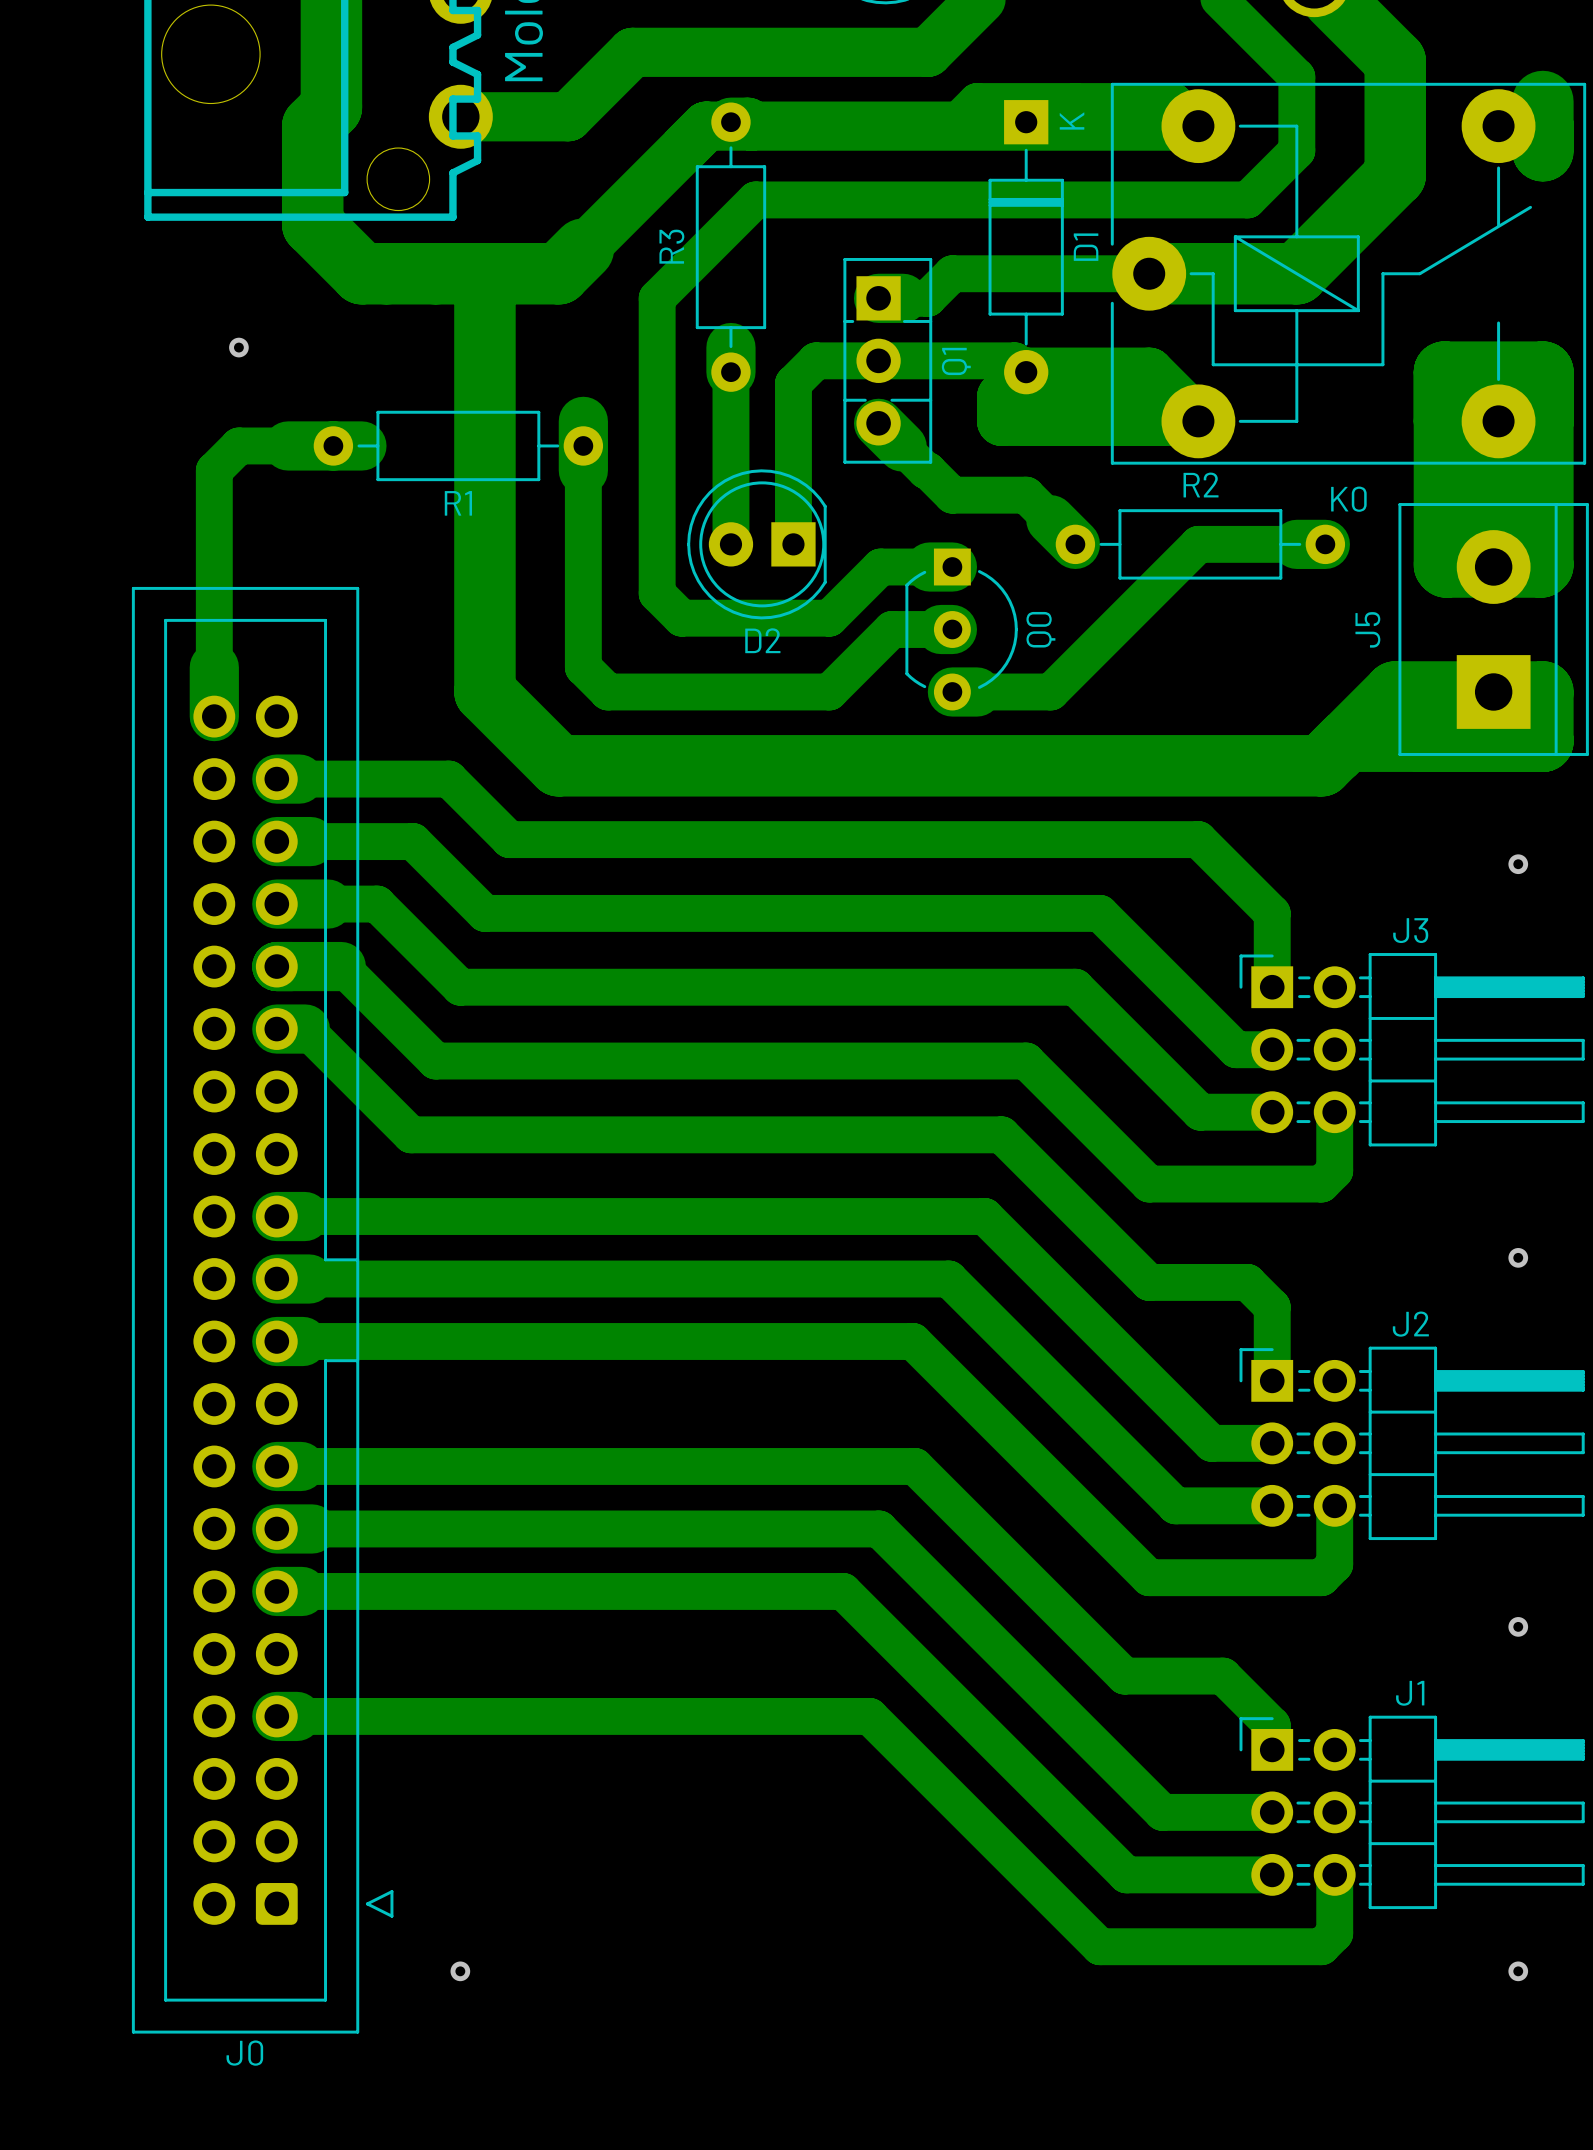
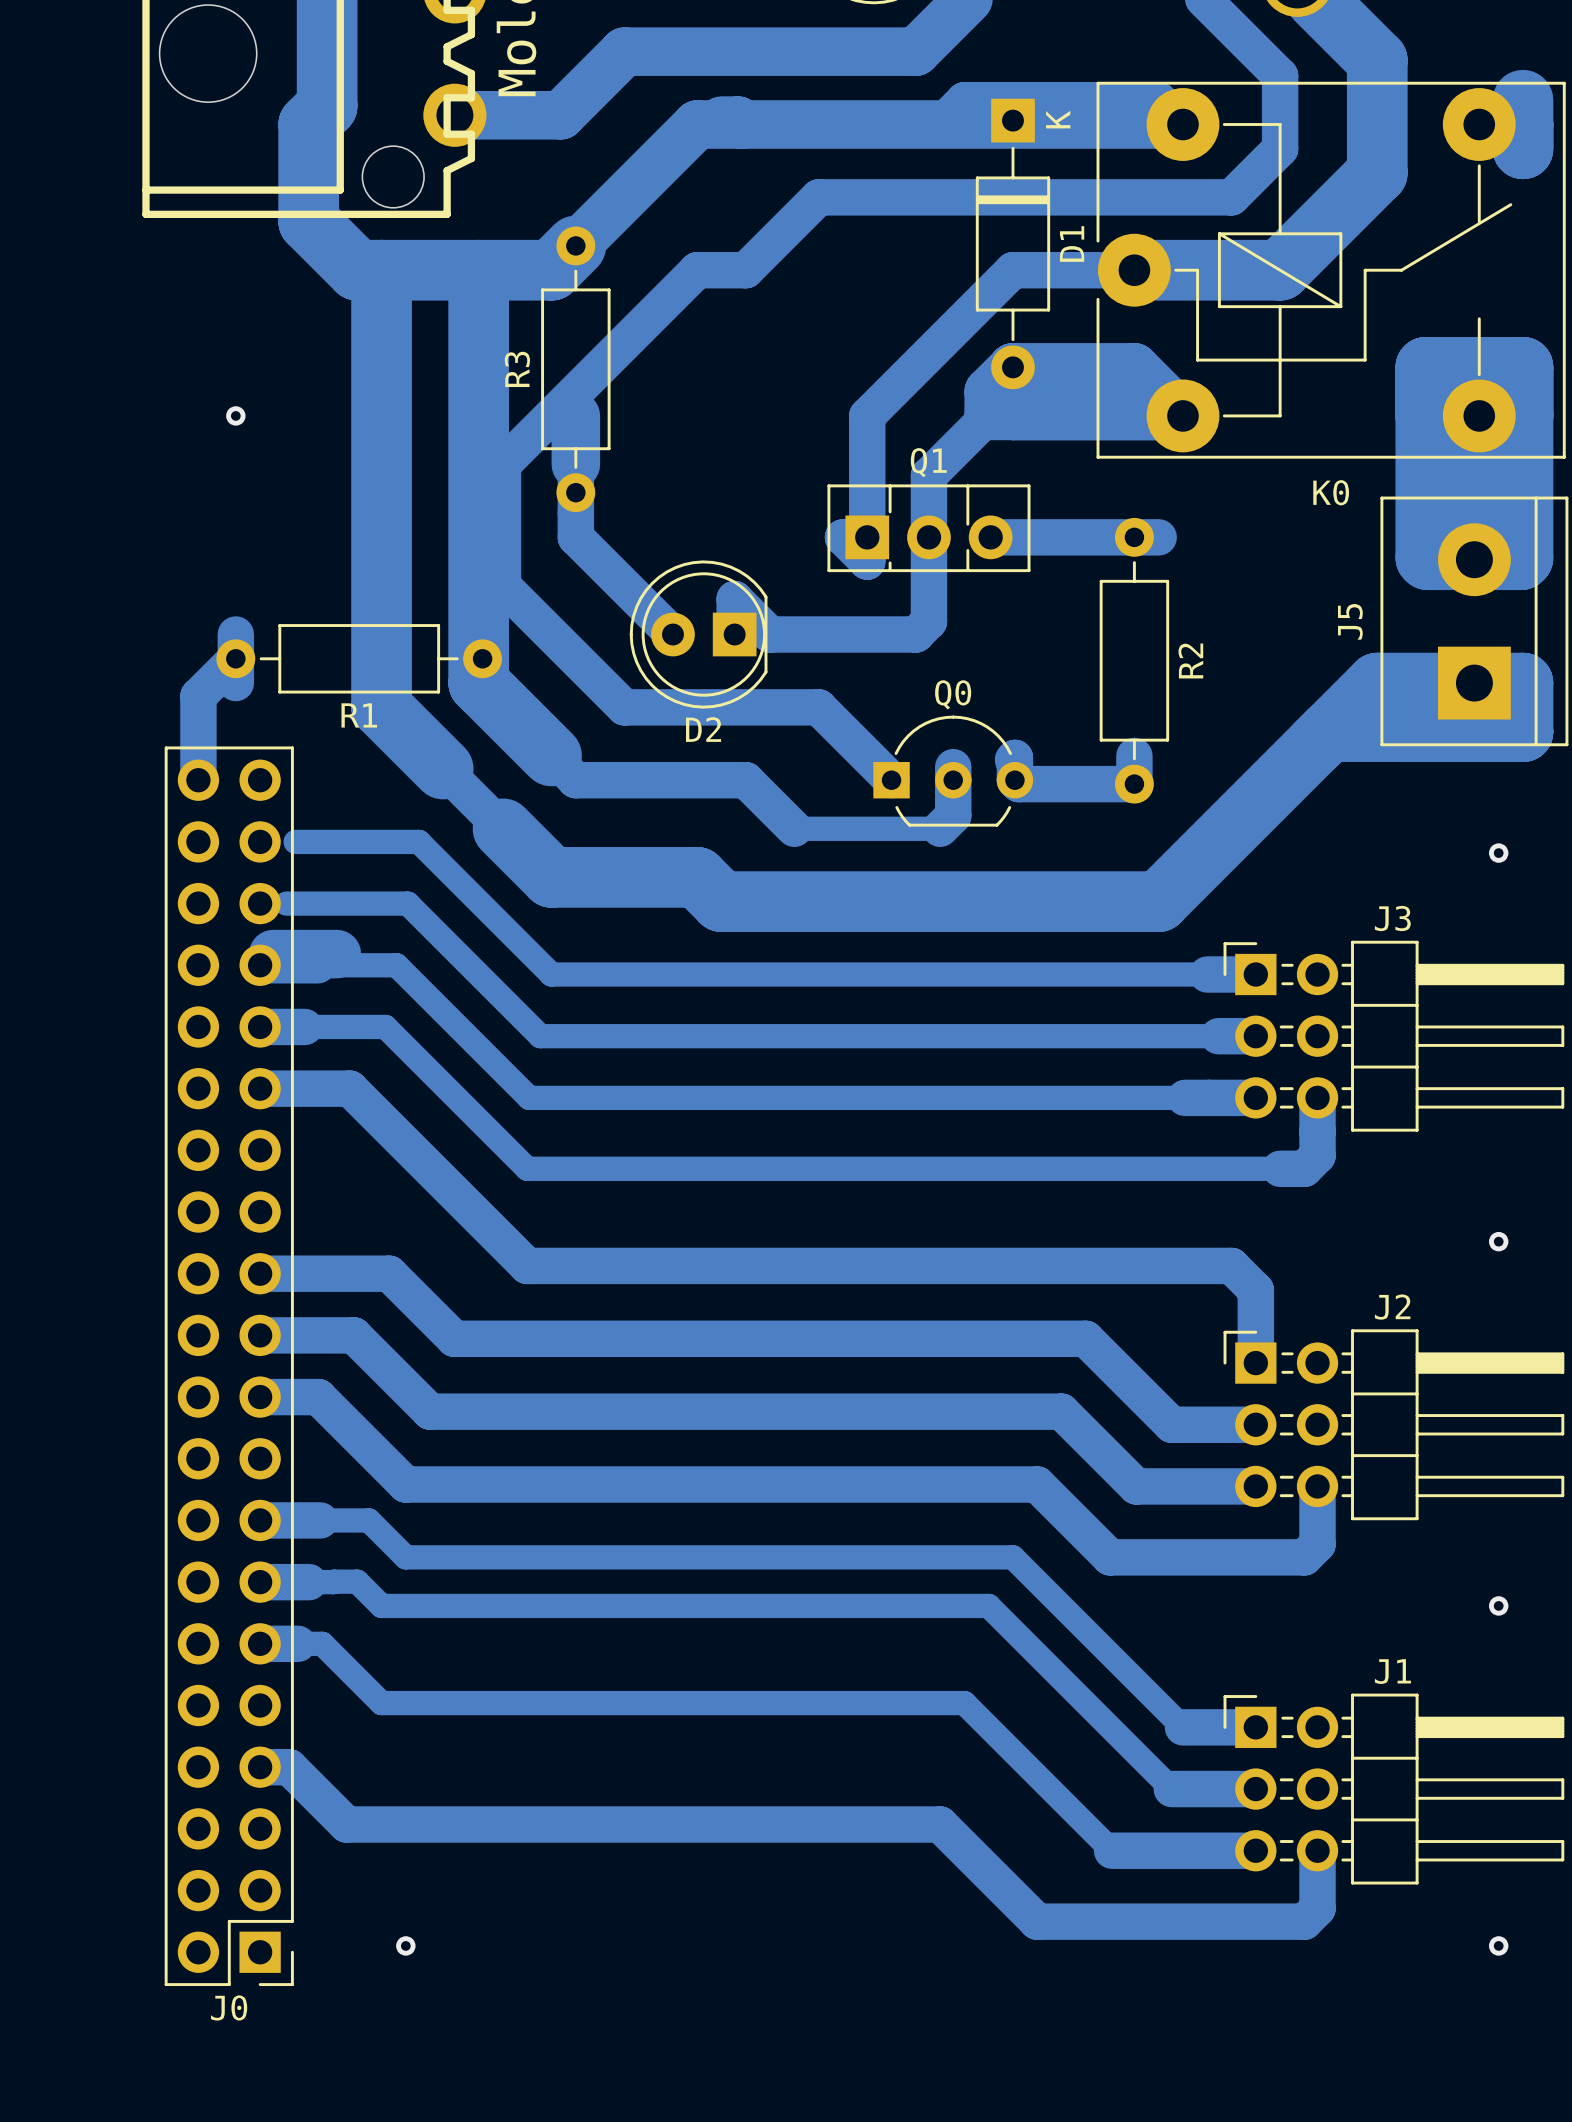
bottom track: (829, 199) (755, 199) (657, 298) (657, 593) (681, 618) (829, 618) (880, 567) (952, 567) -> (818, 197) (745, 270) (697, 270) (502, 464) (502, 585) (575, 658)
R3 position: (730, 247) -> (575, 369)
bottom track: (1026, 273) (952, 273) (927, 298) (878, 298) -> (1012, 270) (867, 415) (867, 561) (842, 537) (867, 537)
via position: (238, 347) -> (235, 415)
bottom track: (730, 347) (730, 544) -> none
Q1 rotation: 0° (887, 360) -> 90° counterclockwise (928, 528)
Q1 position: (887, 360) -> (928, 528)
bottom track: (1026, 372) (1014, 360) (816, 360) (793, 383) (793, 544) -> none
bottom track: none -> (988, 415) (928, 475) (928, 621) (915, 634) (770, 634) (734, 599) (734, 634)
bottom track: (878, 423) (952, 495) (1026, 495) (1075, 544) -> none
bottom track: (361, 445) (238, 445) (214, 470) (214, 716) -> none
R1 position: (458, 445) -> (359, 658)
bottom track: (583, 544) (583, 667) -> (575, 537) (672, 634)
D2 position: (756, 544) -> (698, 634)
bottom track: none -> (990, 537) (1158, 537)
R2 rotation: 0° (1200, 544) -> 90° clockwise (1134, 660)
bottom track: (1325, 544) (1198, 544) (1050, 691) (952, 691) -> none
J0 footprint: [131, 586, 394, 2034] -> [164, 746, 294, 1987]
bottom track: (952, 629) (891, 629) (829, 691) (607, 691) -> (891, 780) (818, 707) (624, 707) (600, 683)
Q0 rotation: 0° (961, 629) -> 90° counterclockwise (953, 771)
Q0 position: (961, 629) -> (953, 771)
bottom track: none -> (235, 634) (235, 683)
bottom track: none -> (235, 658) (198, 696) (198, 780)
bottom track: (558, 765) (1321, 765) -> none
bottom track: none -> (1134, 755) (1134, 784) (1018, 784) (1014, 780) (1014, 757) (1012, 759)
bottom track: (276, 779) (449, 779) -> (381, 270) (381, 707) (443, 769)
bottom track: (509, 839) (804, 839) -> (551, 755) (575, 780) (745, 780) (794, 828)
bottom track width: thick (804, 839) (952, 839) -> thin (794, 828) (940, 828)
bottom track: (952, 839) (1198, 839) (1272, 913) (1272, 987) -> (940, 828) (953, 815) (953, 767)
bottom track: (276, 841) (413, 841) (424, 852) -> (295, 841) (418, 841)
bottom track width: thick (424, 852) (484, 913) -> thin (418, 841) (478, 901)
bottom track: (276, 904) (377, 904) (460, 987) (558, 987) -> (478, 901) (551, 974)
bottom track: (484, 913) (730, 913) -> (502, 828) (551, 877) (697, 877) (721, 901)
bottom track width: thin (730, 913) (1100, 913) -> thick (721, 901) (1085, 901)
bottom track: (1100, 913) (1236, 1049) -> (1085, 901) (1158, 901) (1304, 755)
bottom track: none -> (286, 903) (407, 903) (540, 1036) (1220, 1036)
bottom track: (292, 966) (341, 966) (435, 1061) (1026, 1061) (1149, 1184) -> (260, 1026) (385, 1026) (527, 1168) (1134, 1168)
bottom track: none -> (260, 965) (396, 965) (529, 1097) (1184, 1097)
bottom track width: thick (558, 987) (1075, 987) -> thin (551, 974) (1061, 974)
bottom track: (1075, 987) (1200, 1112) -> (1061, 974) (1255, 974)
bottom track: (276, 1029) (305, 1029) (411, 1134) (1001, 1134) (1149, 1282) -> (260, 1088) (349, 1088) (527, 1265) (1134, 1265)
bottom track width: thick (1149, 1184) (1296, 1184) -> thin (1134, 1168) (1280, 1168)
bottom track: (276, 1216) (984, 1216) (1211, 1443) -> (260, 1273) (389, 1273) (454, 1338) (1085, 1338) (1171, 1424) (1196, 1424)
bottom track: (276, 1279) (948, 1279) (1175, 1505) -> (260, 1335) (353, 1335) (430, 1411) (1061, 1411) (1136, 1486) (1160, 1486)
bottom track: (276, 1341) (913, 1341) (1149, 1577) -> (260, 1397) (318, 1397) (405, 1484) (1037, 1484) (1110, 1557) (1134, 1557)
bottom track: (276, 1466) (915, 1466) (1026, 1577) -> (260, 1520) (368, 1520) (405, 1557) (1012, 1557)
bottom track: (276, 1528) (879, 1528) (1162, 1812) (1187, 1812) -> (260, 1582) (357, 1581) (381, 1605) (988, 1605) (1171, 1789)
bottom track width: thick (1026, 1577) (1124, 1676) -> thin (1012, 1557) (1110, 1654)
bottom track: (276, 1591) (843, 1591) (977, 1725) -> (260, 1643) (322, 1643) (381, 1703) (964, 1703)
bottom track: (1124, 1676) (1223, 1676) (1272, 1725) (1272, 1749) -> (1110, 1654) (1182, 1727) (1255, 1727)
bottom track: (276, 1716) (869, 1716) (1100, 1946) -> (260, 1767) (289, 1767) (346, 1824) (940, 1824) (1037, 1921) (1085, 1921)
bottom track width: thick (977, 1725) (1126, 1874) -> thin (964, 1703) (1112, 1850)
via position: (460, 1971) -> (405, 1945)
J0 name position: J0 (244, 2053) -> J0 (229, 2007)

